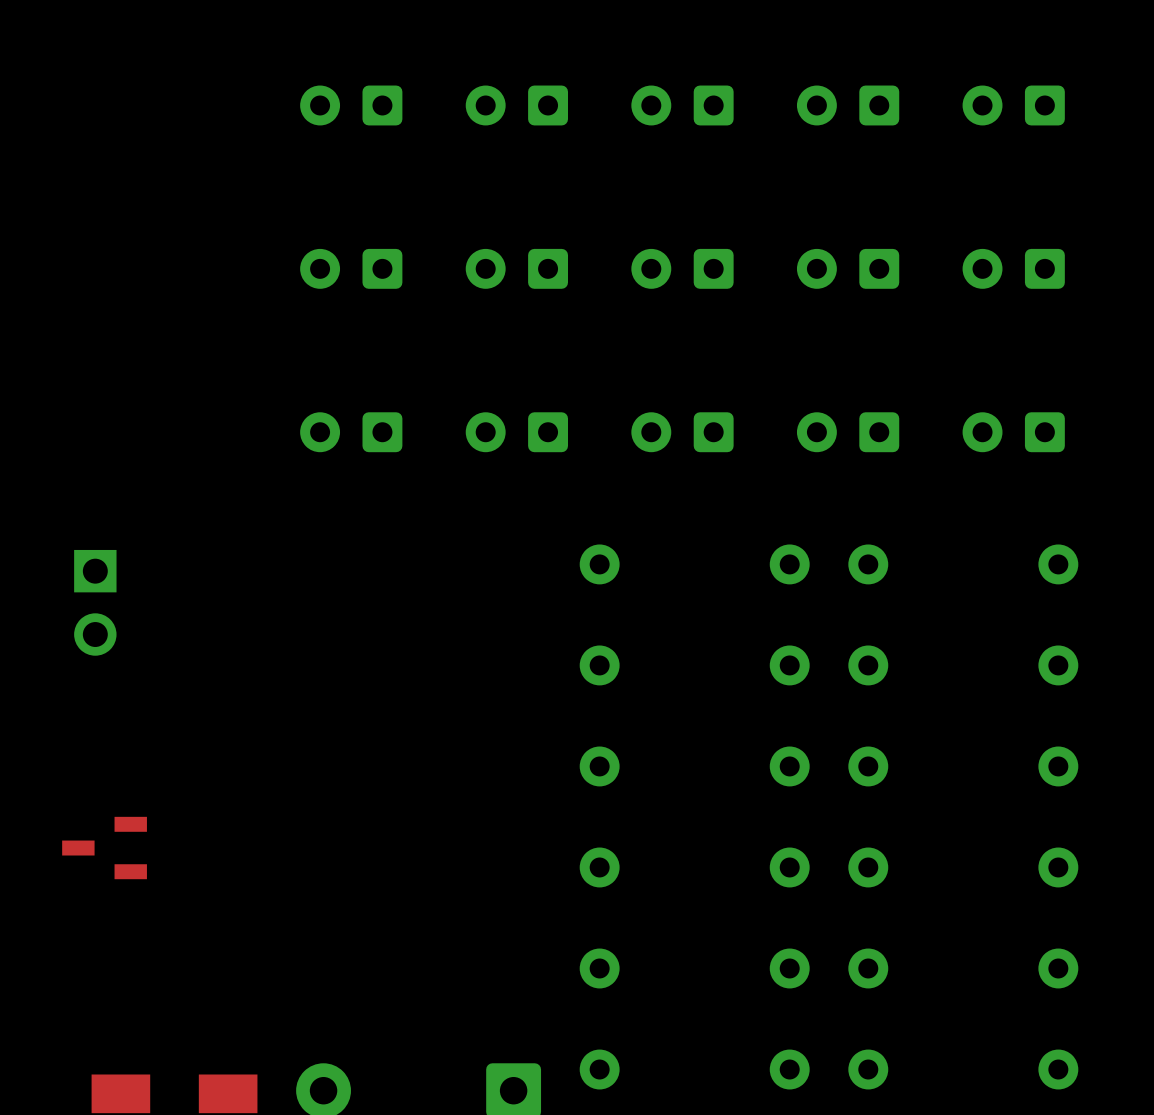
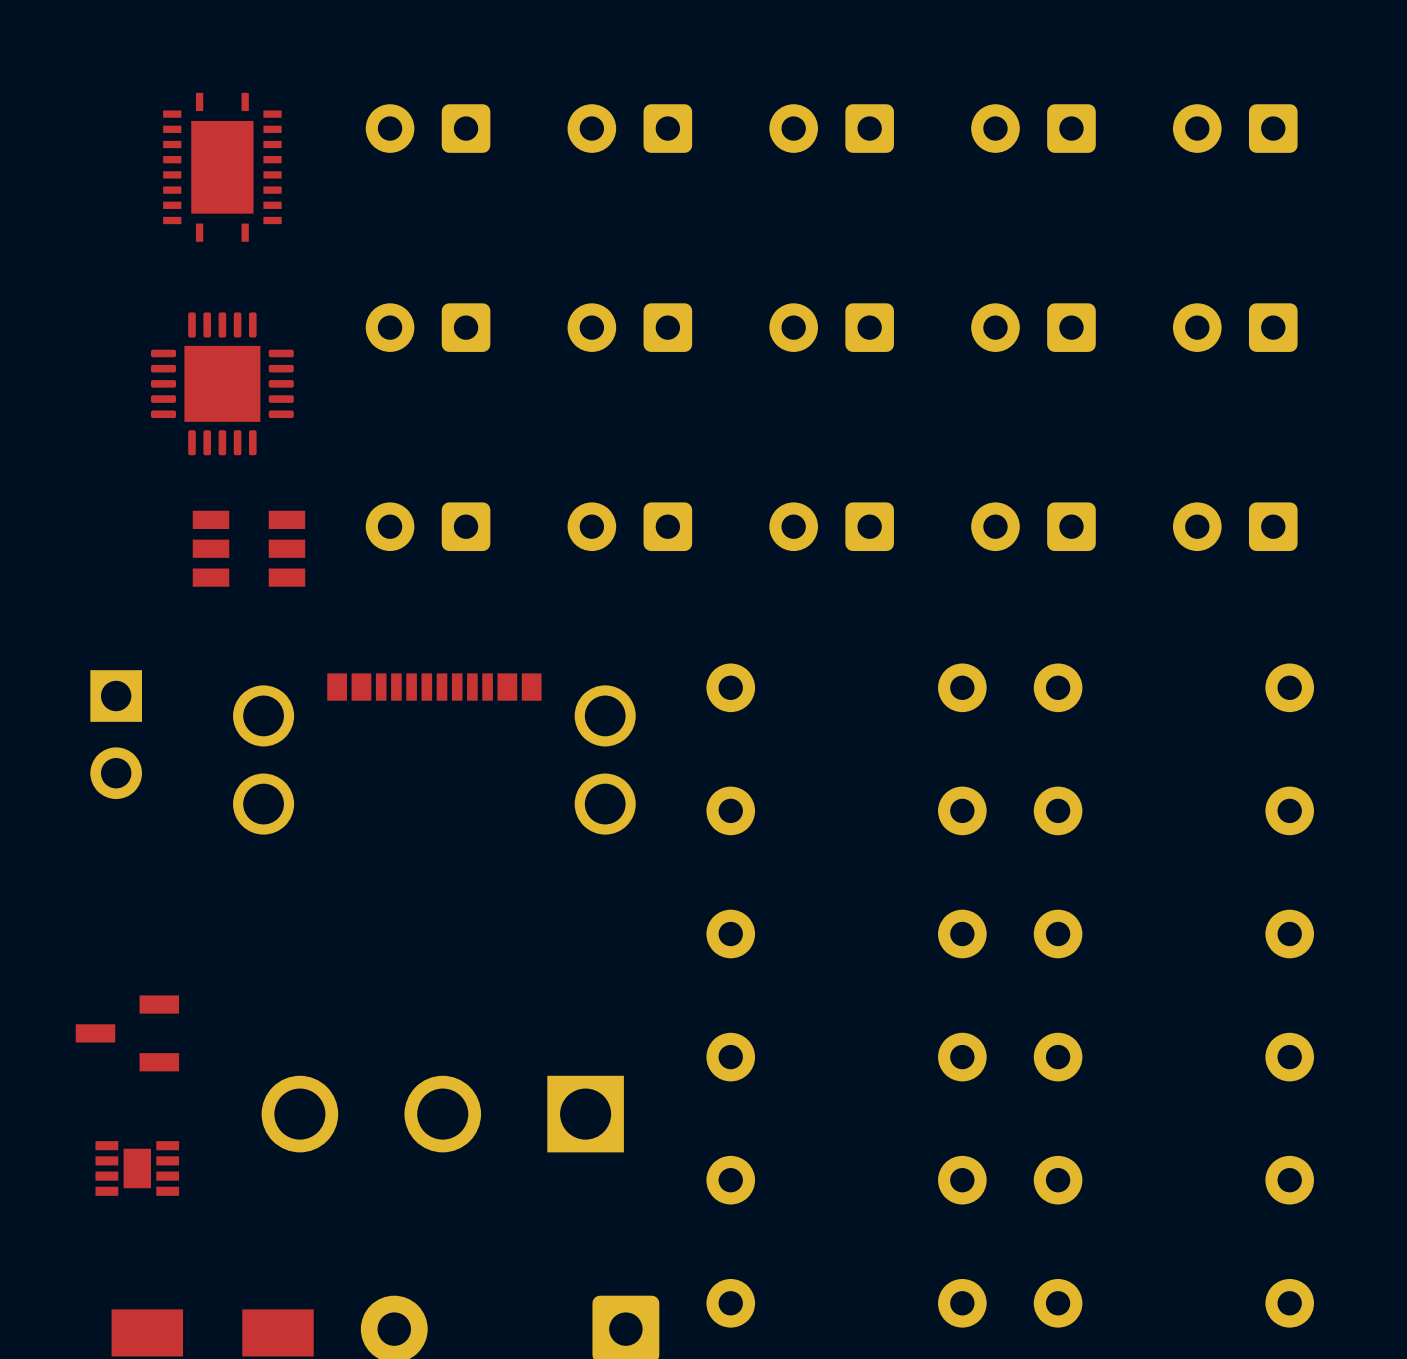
part: none -> (222, 167)
part: none -> (222, 383)
part: none -> (248, 548)
part: none -> (434, 753)
part: none -> (442, 1114)
part: none -> (137, 1168)

